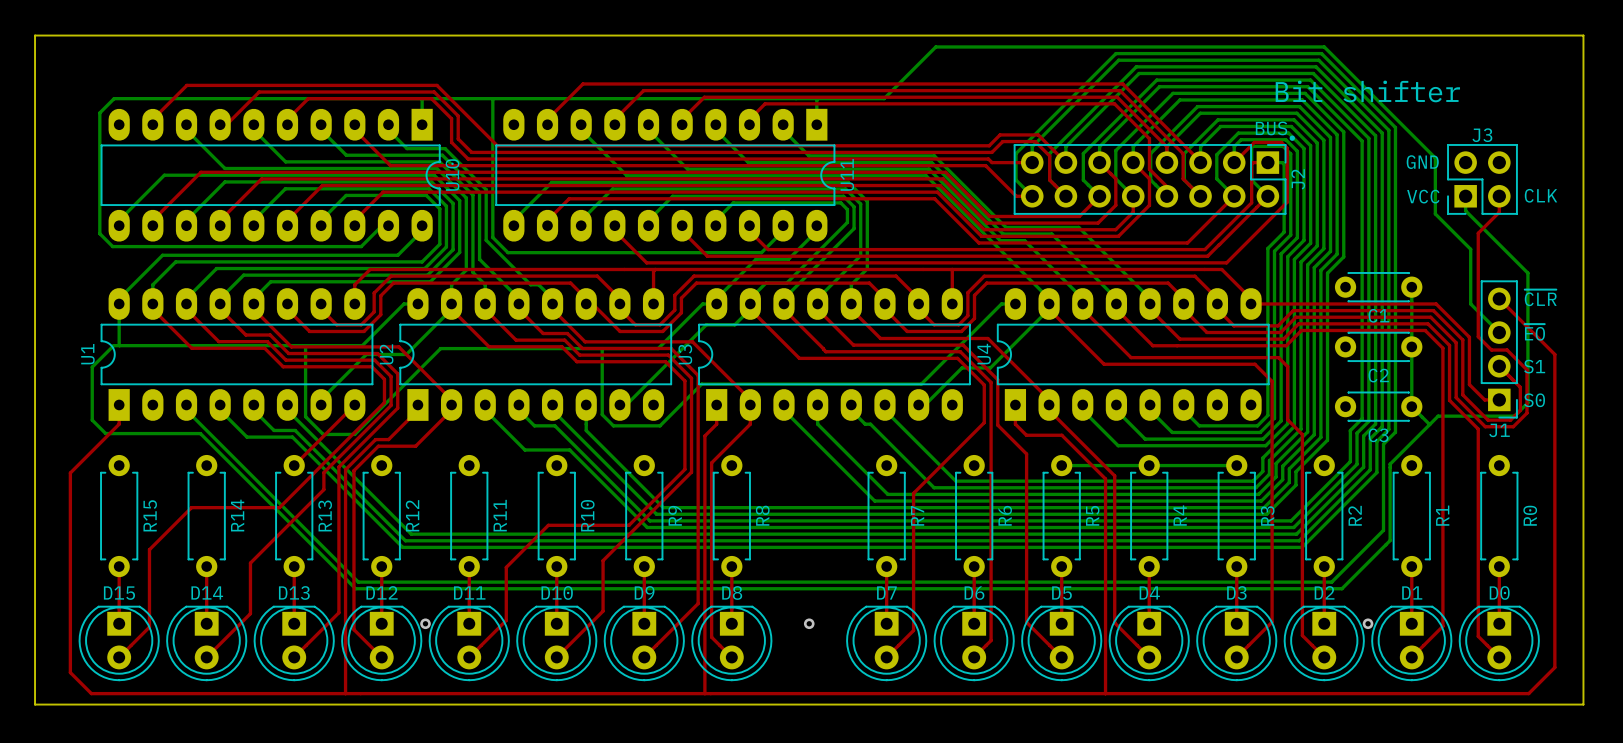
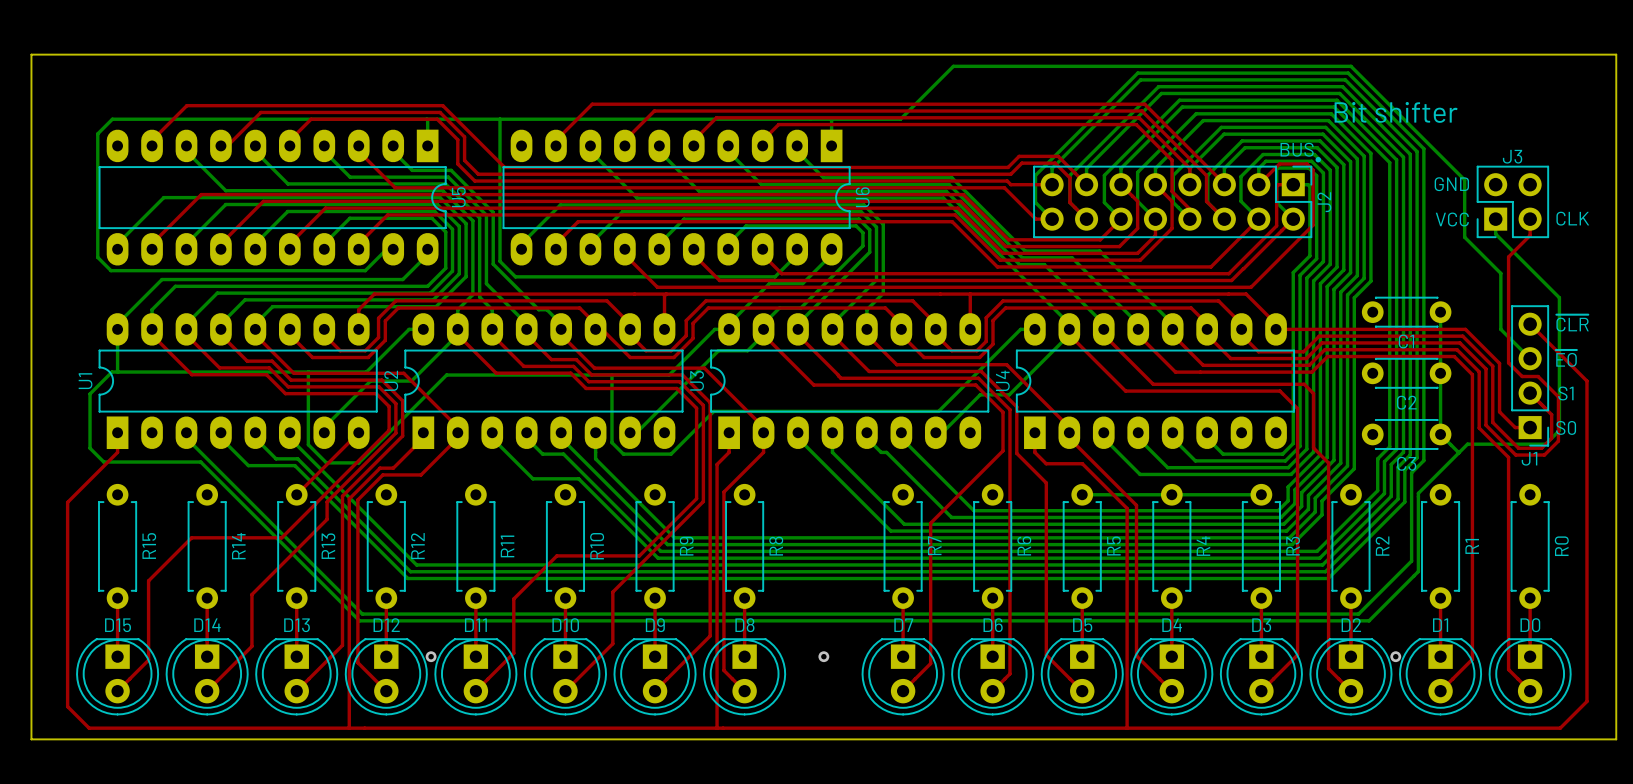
U11 name: U11 (847, 174) -> U6 (862, 197)
U10 name: U10 (452, 175) -> U5 (458, 197)

